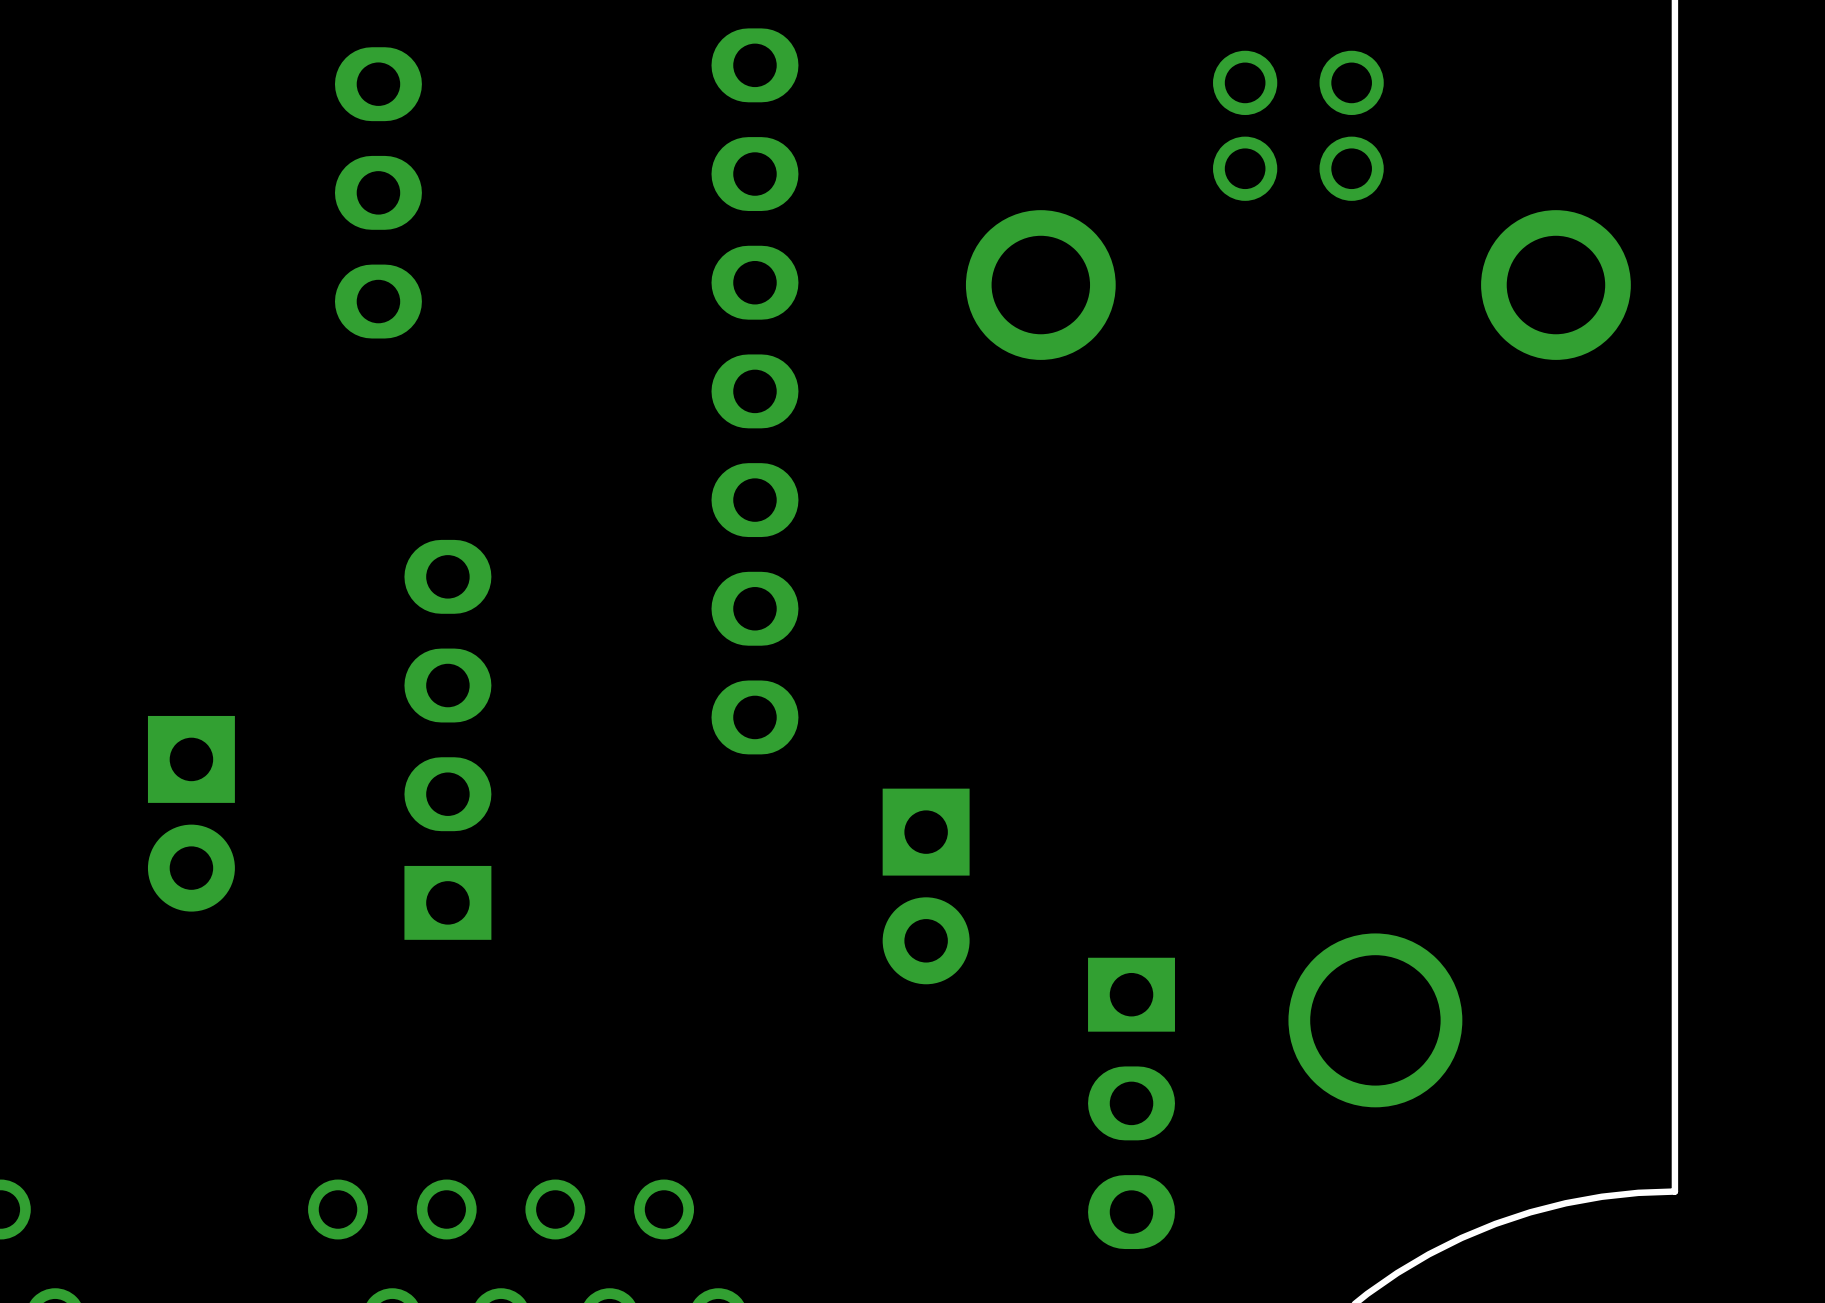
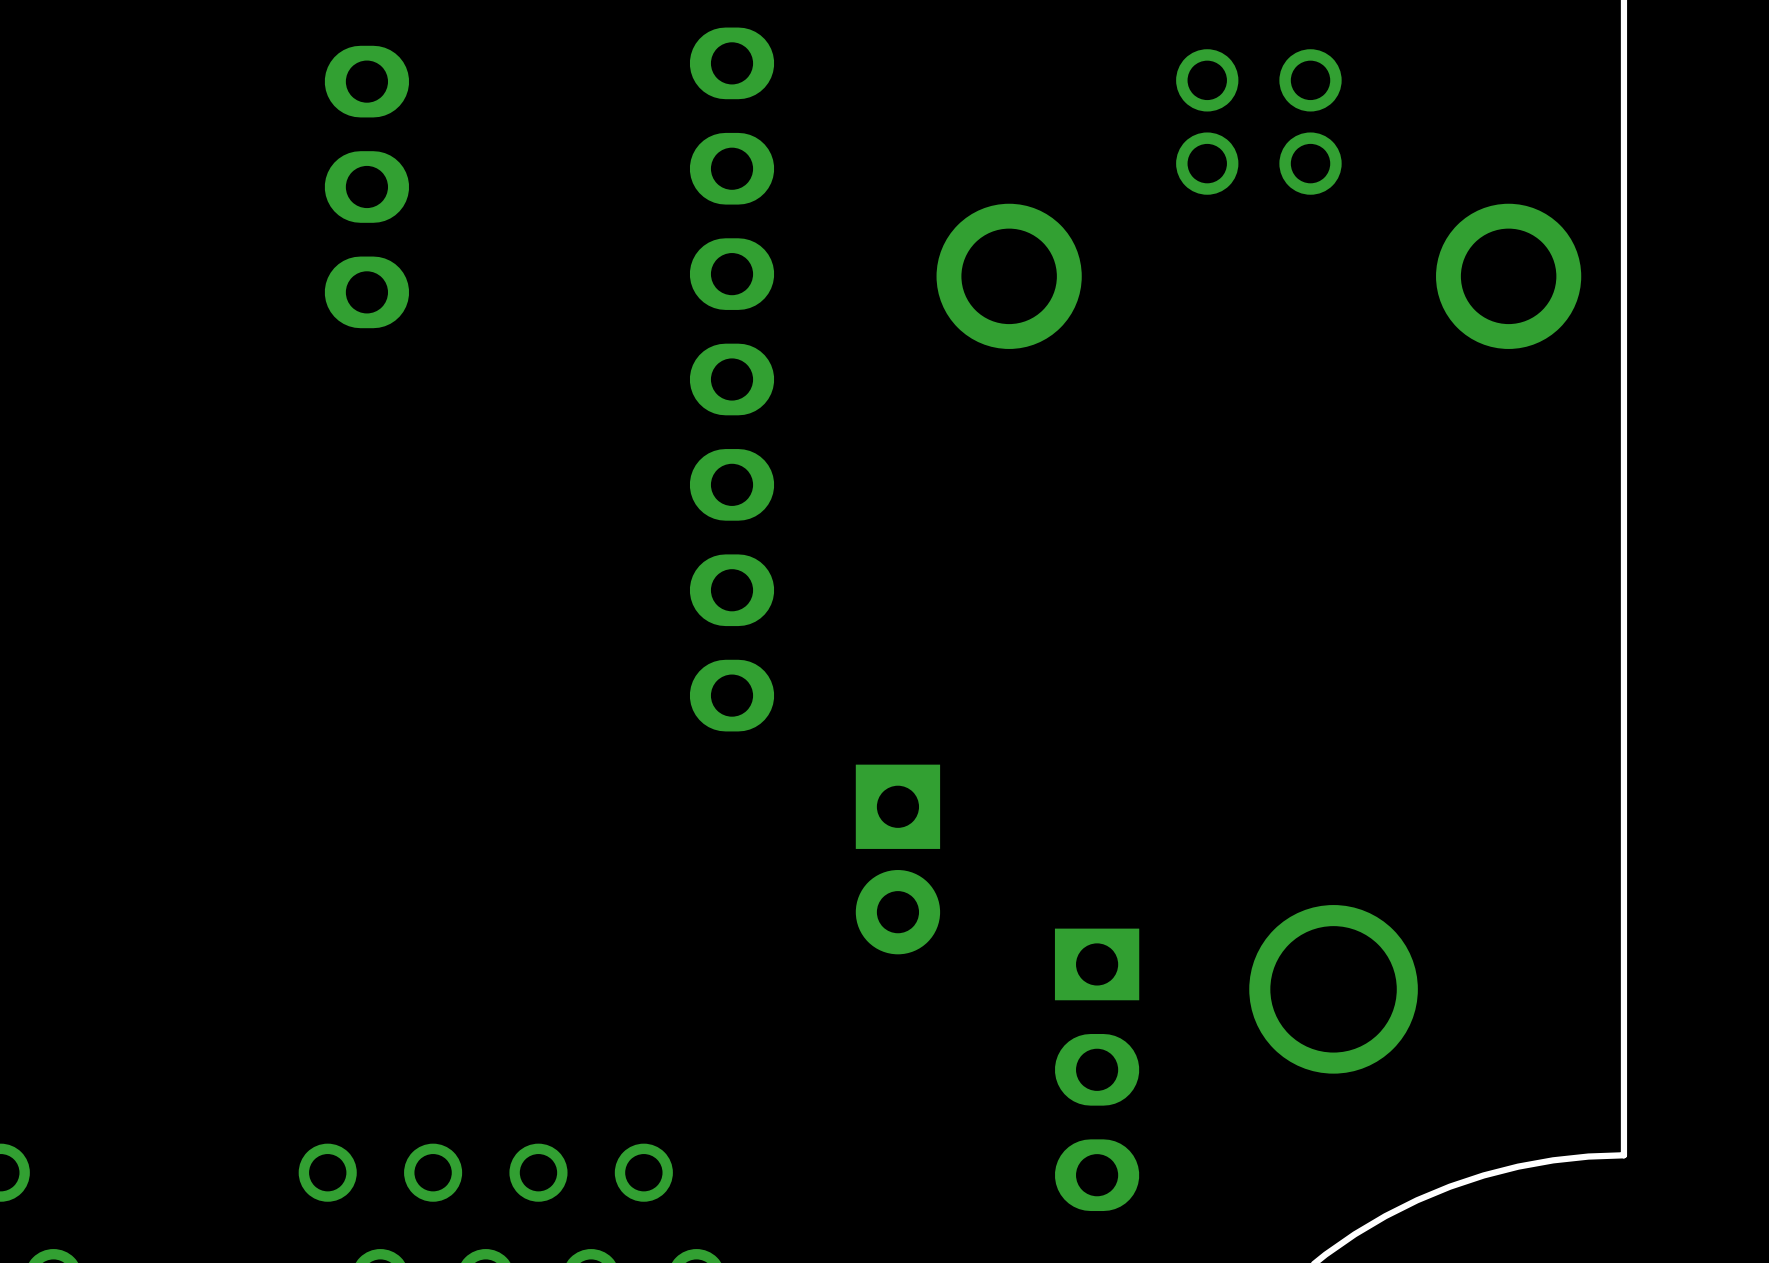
part: (447, 739) -> none
part: (191, 813) -> none

